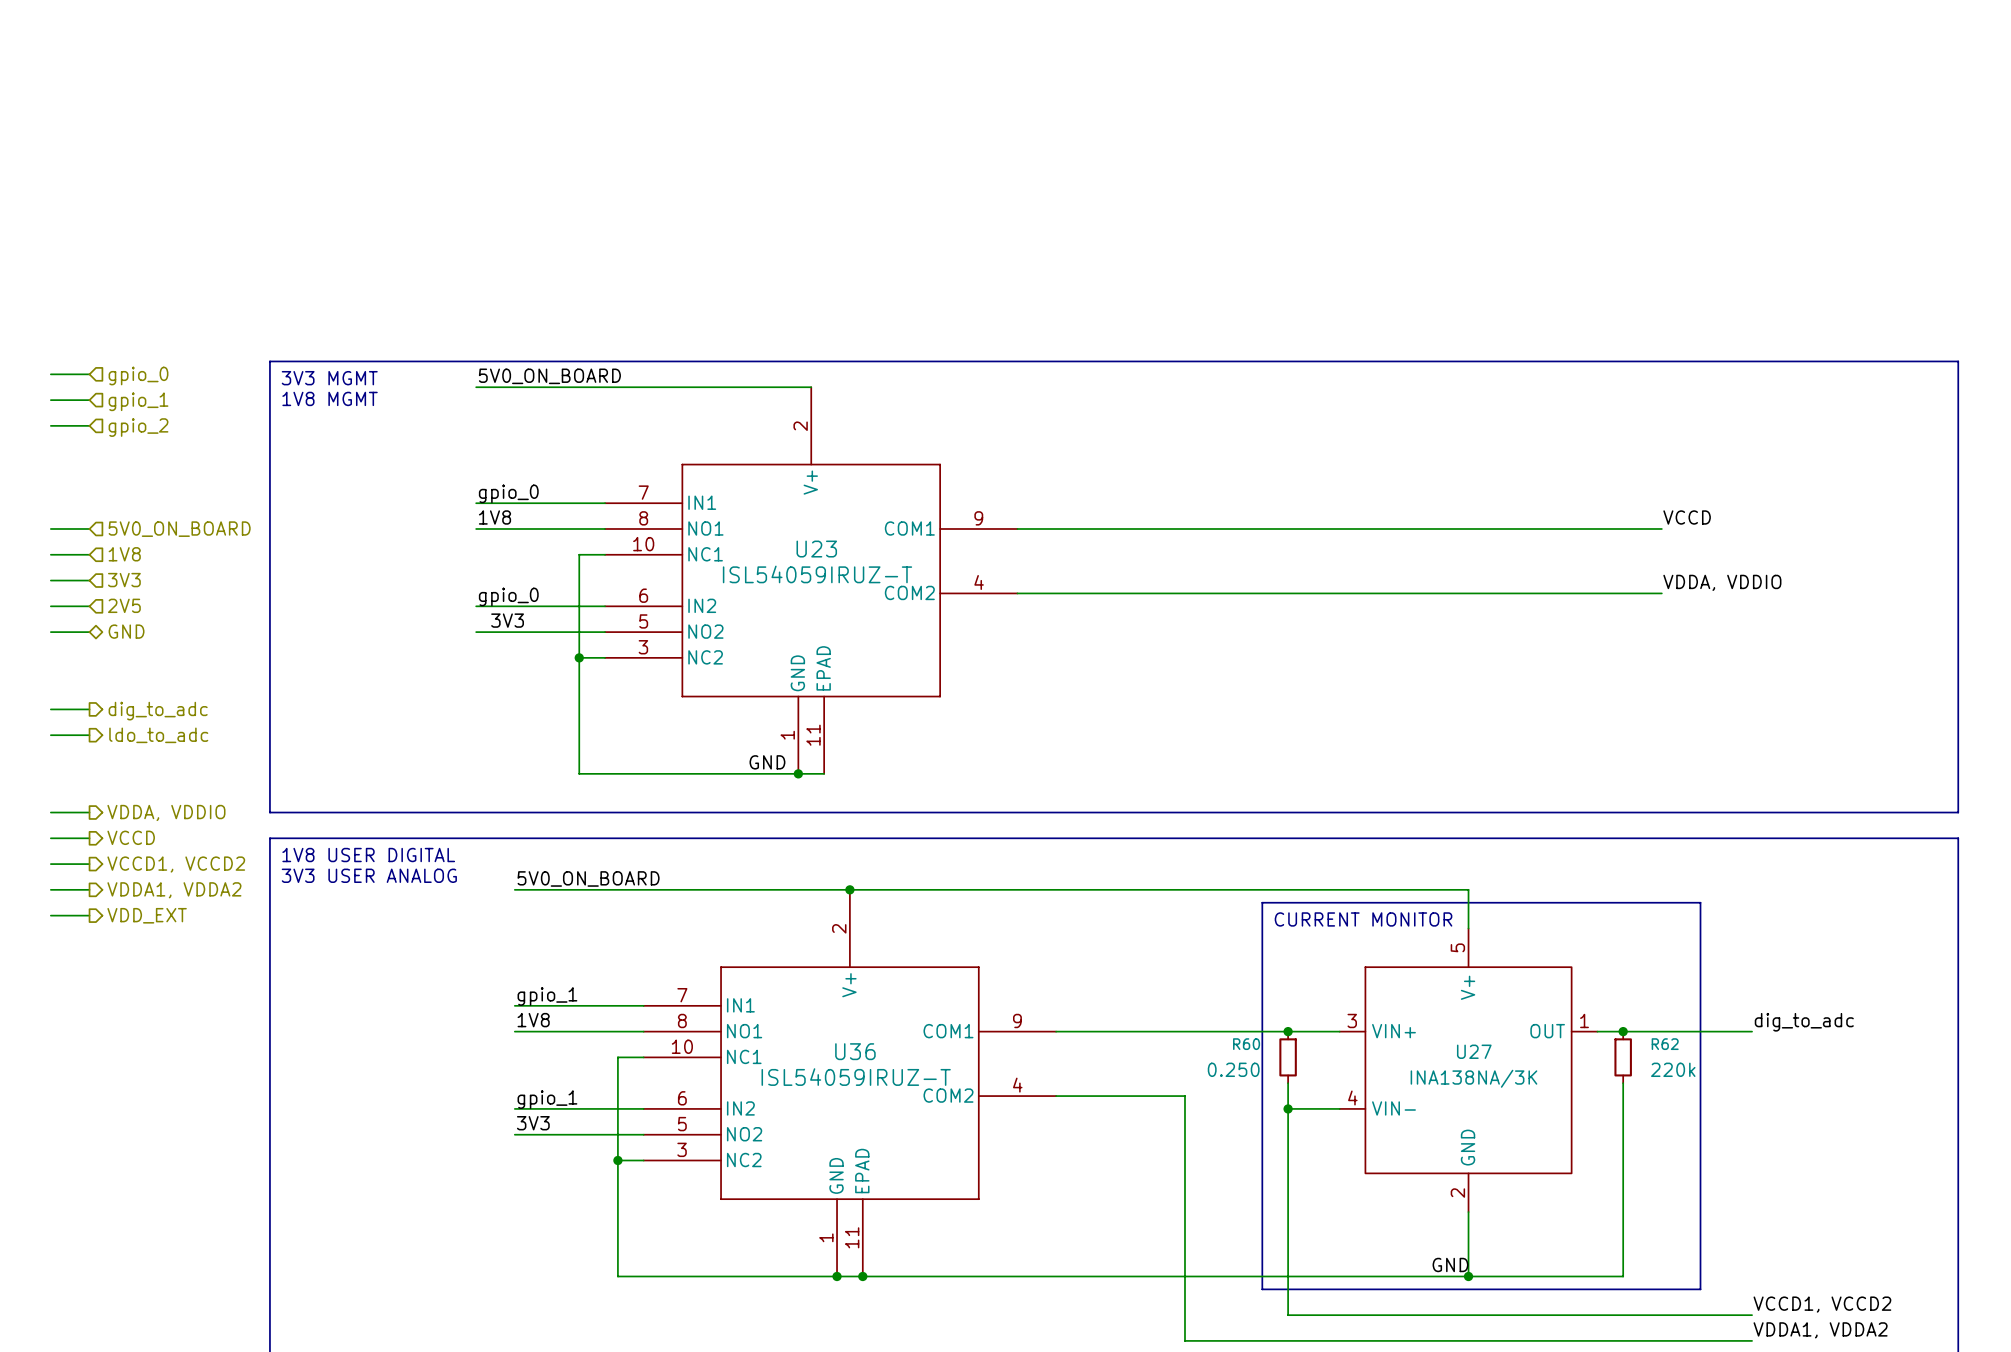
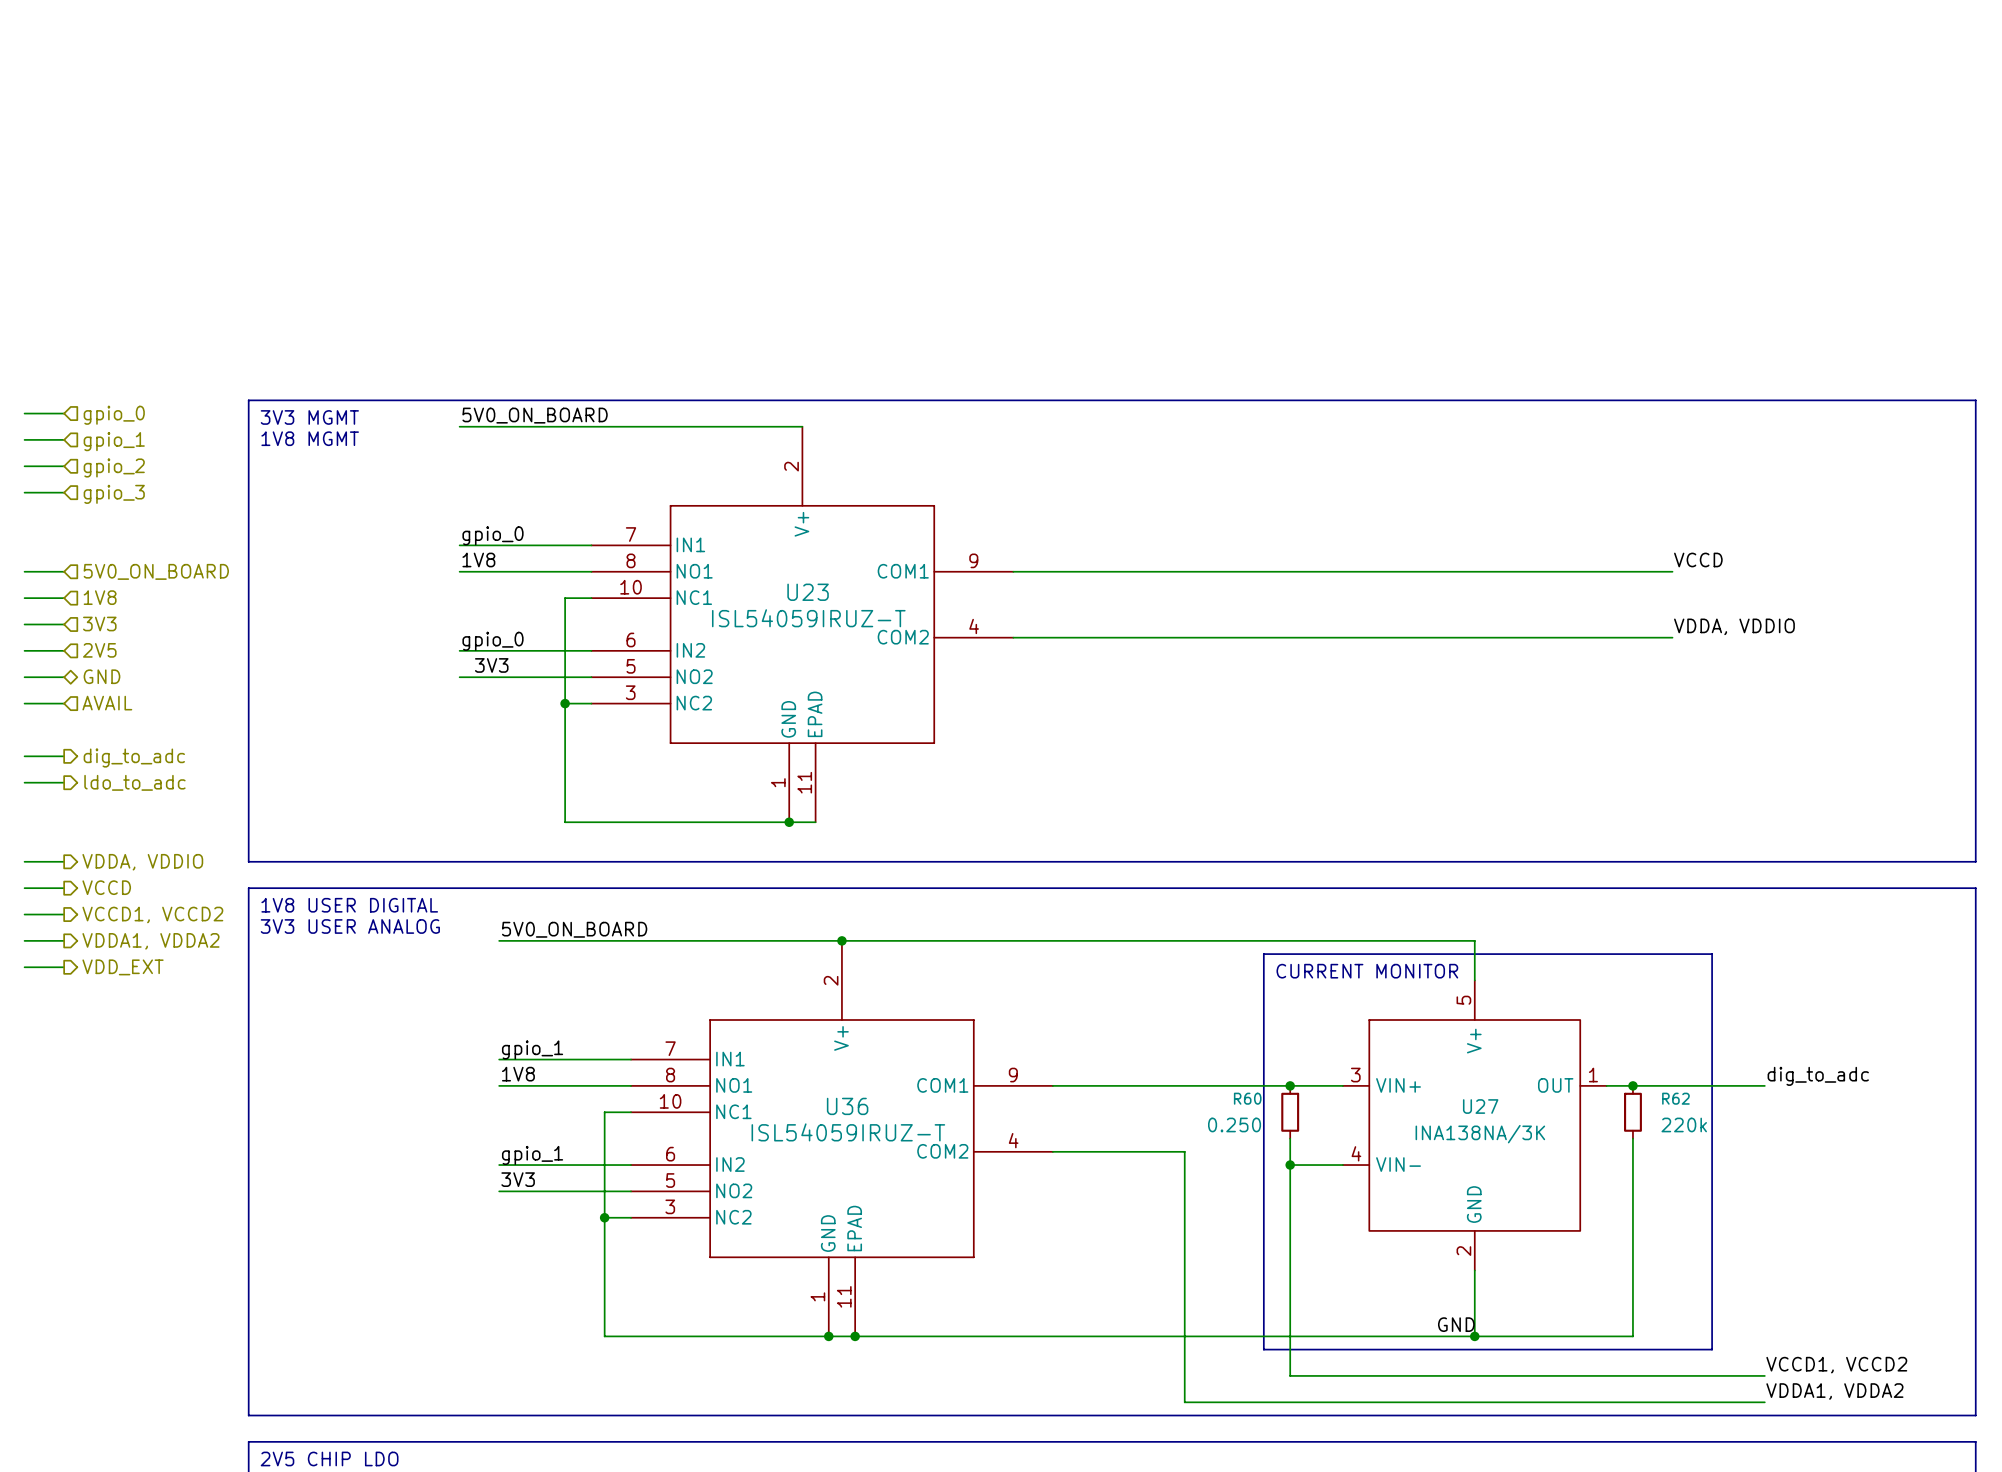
wire: none -> (24, 492) (64, 492)
hierarchical label: none -> gpio_3 (114, 494)
wire: none -> (24, 703) (64, 703)
hierarchical label: none -> AVAIL (107, 703)
label: GND (767, 762) -> none

